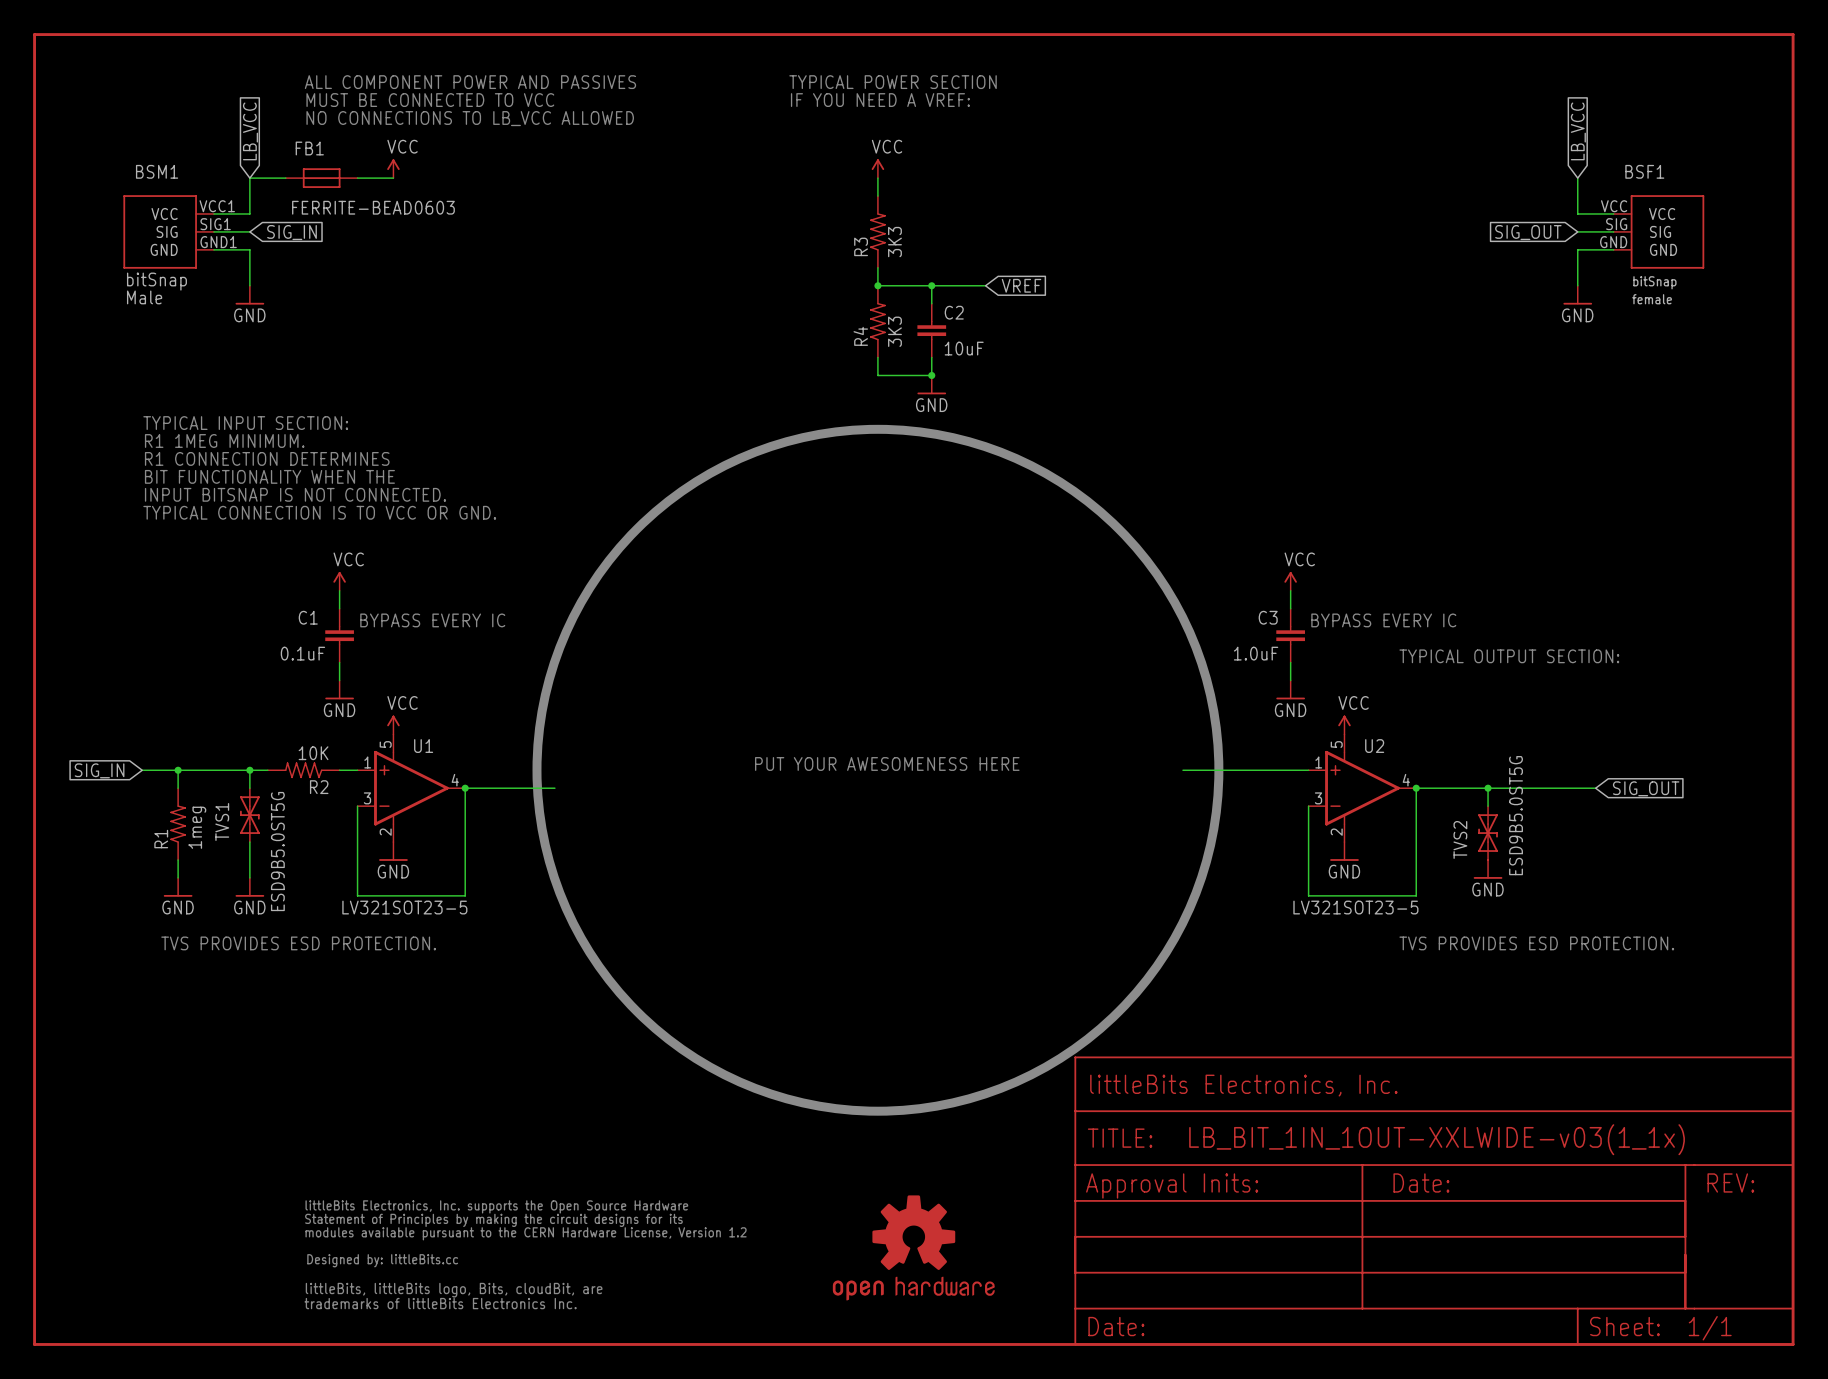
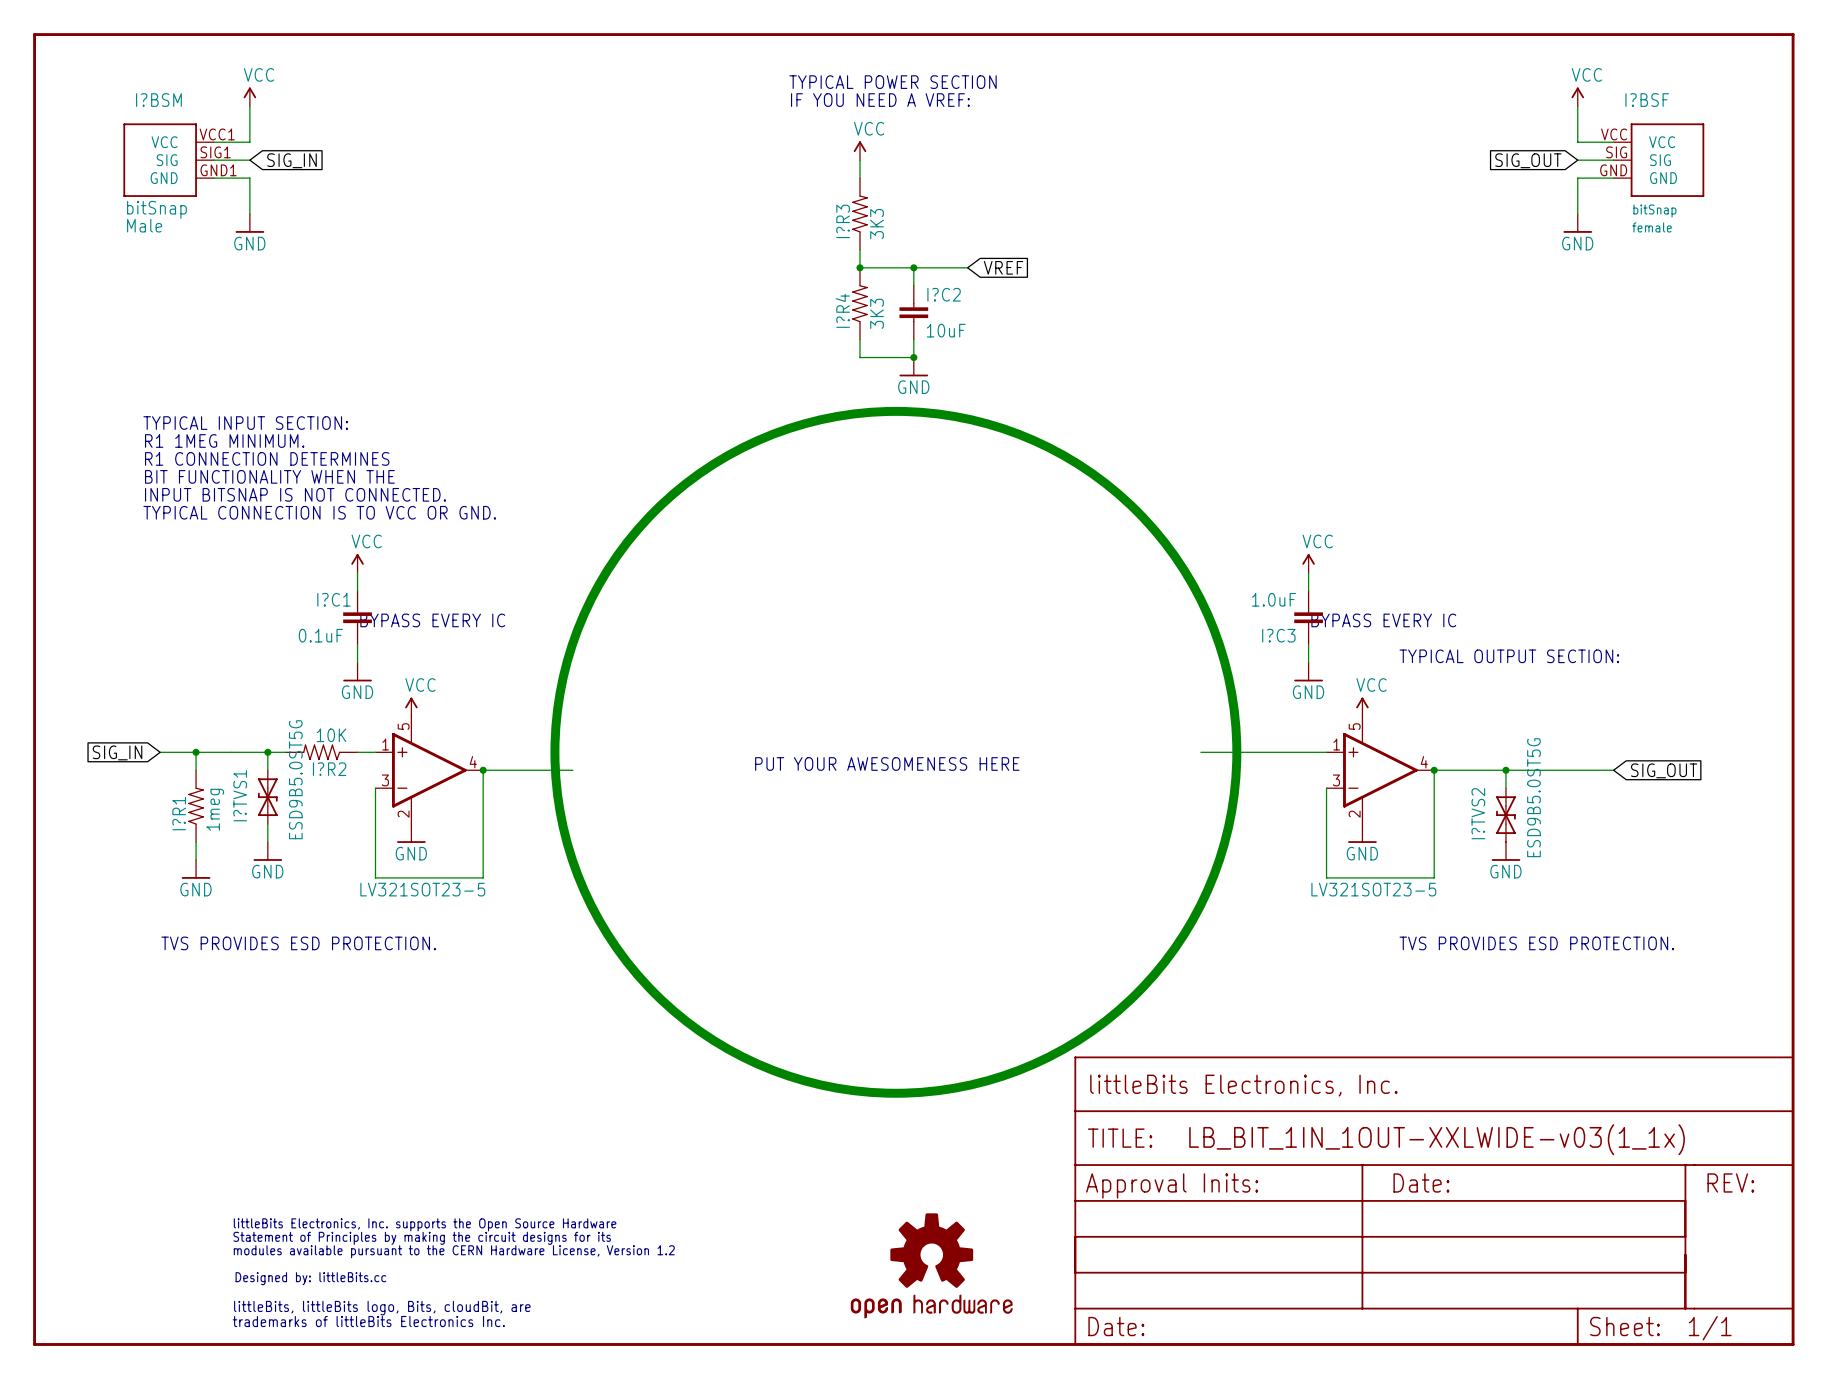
text: ALL COMPONENT POWER AND PASSIVES (470, 82) -> none
power symbol: none -> VCC (1577, 96)
text: MUST BE CONNECTED TO VCC (430, 100) -> none
wire: none -> (249, 106) (249, 142) (213, 142)
wire: none -> (1577, 106) (1577, 142) (1613, 142)
text: NO CONNECTIONS TO LB_VCC ALLOWED (470, 118) -> none
global label: LB_VCC (250, 131) -> none
global label: LB_VCC (1578, 131) -> none
I?BSM: none -> (168, 160)
I?BSF: none -> (1658, 160)
power symbol position: VCC (393, 168) -> VCC (249, 96)
power symbol position: VCC (877, 168) -> VCC (859, 150)
wire: (249, 178) (285, 178) -> (249, 178) (213, 178)
FB1: FERRITE-BEAD0603 (321, 178) -> none
wire: (357, 178) (393, 178) -> none
wire: (877, 178) (877, 196) -> (859, 160) (859, 178)
wire: (213, 213) (249, 213) -> (213, 160) (249, 160)
I?R3: none -> 3K3 (859, 213)
wire: (1577, 213) (1613, 213) -> (1577, 160) (1613, 160)
BSM1: (168, 231) -> none
wire: (213, 231) (249, 231) -> none
R3: 3K3 (877, 231) -> none
wire: (1577, 231) (1613, 231) -> (1577, 178) (1613, 178)
BSF1: (1658, 231) -> none
global label position: SIG_IN (291, 232) -> SIG_IN (291, 160)
global label position: SIG_OUT (1528, 232) -> SIG_OUT (1528, 160)
wire: (213, 249) (249, 249) (249, 285) -> none
wire: (1613, 249) (1577, 249) (1577, 285) -> none
junction: none -> (859, 267)
wire: (877, 267) (877, 285) (985, 285) -> (859, 249) (859, 267) (967, 267)
junction: none -> (913, 267)
junction: (877, 285) -> none
wire: (931, 285) (931, 303) -> (913, 267) (913, 285)
junction: (931, 285) -> none
global label position: VREF (1021, 285) -> VREF (1003, 267)
power symbol position: GND (249, 295) -> GND (249, 223)
power symbol position: GND (1577, 295) -> GND (1577, 223)
I?R4: none -> 3K3 (859, 303)
I?C2: none -> 10uF (913, 312)
R4: 3K3 (877, 321) -> none
C2: 10uF (931, 330) -> none
wire: (877, 357) (877, 375) (931, 375) (931, 357) -> (859, 339) (859, 357) (913, 357) (913, 339)
junction position: (931, 375) -> (913, 357)
power symbol position: GND (931, 384) -> GND (913, 366)
drawing: none -> [550, 406, 1242, 1098]
drawing: [532, 424, 1224, 1116] -> none
power symbol position: VCC (339, 581) -> VCC (357, 563)
power symbol position: VCC (1290, 581) -> VCC (1308, 563)
wire: (339, 590) (339, 608) -> (357, 572) (357, 590)
wire: (1290, 590) (1290, 608) -> (1308, 572) (1308, 590)
I?C1: none -> 0.1uF (357, 617)
I?C3: none -> 1.0uF (1308, 617)
C1: 0.1uF (339, 635) -> none
C3: 1.0uF (1290, 635) -> none
wire: (339, 662) (339, 680) -> (357, 644) (357, 662)
wire: (1290, 662) (1290, 680) -> (1308, 644) (1308, 662)
power symbol position: GND (339, 689) -> GND (357, 672)
power symbol position: GND (1290, 689) -> GND (1308, 672)
power symbol position: VCC (393, 724) -> VCC (411, 707)
power symbol position: VCC (1344, 724) -> VCC (1362, 707)
wire: none -> (160, 752) (285, 752)
I?R2: none -> 10K (321, 752)
global label position: SIG_IN (99, 770) -> SIG_IN (117, 752)
wire: (142, 770) (267, 770) -> (267, 752) (267, 770)
wire: (178, 770) (178, 788) -> (196, 752) (196, 770)
junction position: (178, 770) -> (196, 752)
wire: (249, 770) (249, 788) -> (267, 824) (267, 842)
junction position: (249, 770) -> (267, 752)
R2: 10K (303, 770) -> none
wire: (339, 770) (357, 770) -> (357, 752) (375, 752)
part: none -> LV321SOT23-5 (429, 770)
wire: (1182, 770) (1308, 770) -> (1200, 752) (1326, 752)
part: none -> LV321SOT23-5 (1380, 770)
U1: LV321SOT23-5 (411, 788) -> none
junction position: (465, 788) -> (483, 770)
wire: (554, 788) (465, 788) (465, 895) (357, 895) (357, 806) -> (572, 770) (483, 770) (483, 877) (375, 877) (375, 788)
U2: LV321SOT23-5 (1362, 788) -> none
junction position: (1416, 788) -> (1434, 770)
wire: (1488, 788) (1488, 806) -> (1505, 770) (1505, 788)
junction position: (1488, 788) -> (1505, 770)
wire: (1595, 788) (1416, 788) (1416, 895) (1308, 895) (1308, 806) -> (1613, 770) (1434, 770) (1434, 877) (1326, 877) (1326, 788)
global label position: SIG_OUT (1646, 788) -> SIG_OUT (1664, 770)
I?TVS1: none -> ESD9B5.0ST5G (267, 797)
I?R1: none -> 1meg (196, 806)
TVS1: ESD9B5.0ST5G (249, 815) -> none
I?TVS2: none -> ESD9B5.0ST5G (1505, 815)
R1: 1meg (178, 824) -> none
TVS2: ESD9B5.0ST5G (1488, 833) -> none
wire: (249, 842) (249, 877) -> none
power symbol: none -> GND (267, 851)
power symbol position: GND (393, 851) -> GND (411, 833)
power symbol position: GND (1344, 851) -> GND (1362, 833)
wire: (178, 859) (178, 877) -> (196, 842) (196, 859)
power symbol position: GND (1488, 869) -> GND (1505, 851)
power symbol position: GND (178, 887) -> GND (196, 869)
power symbol: GND (249, 887) -> none
part position: (913, 1247) -> (931, 1265)
part position: (525, 1254) -> (453, 1272)

